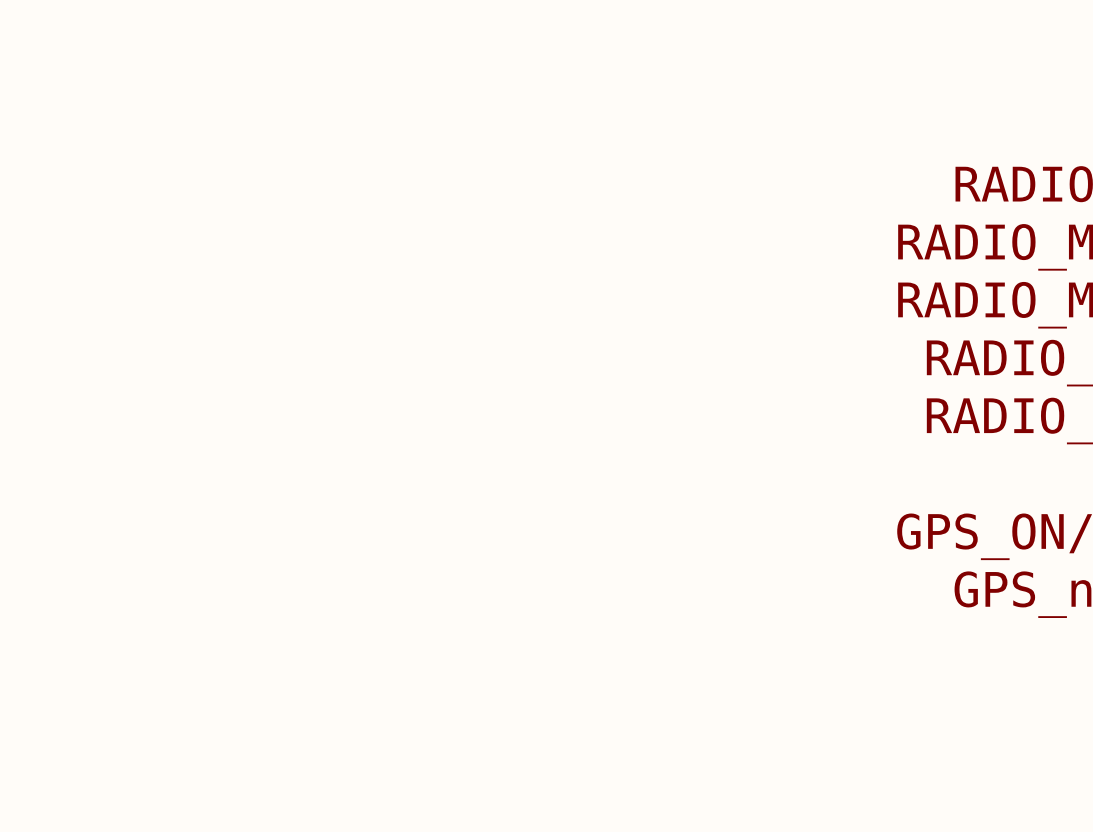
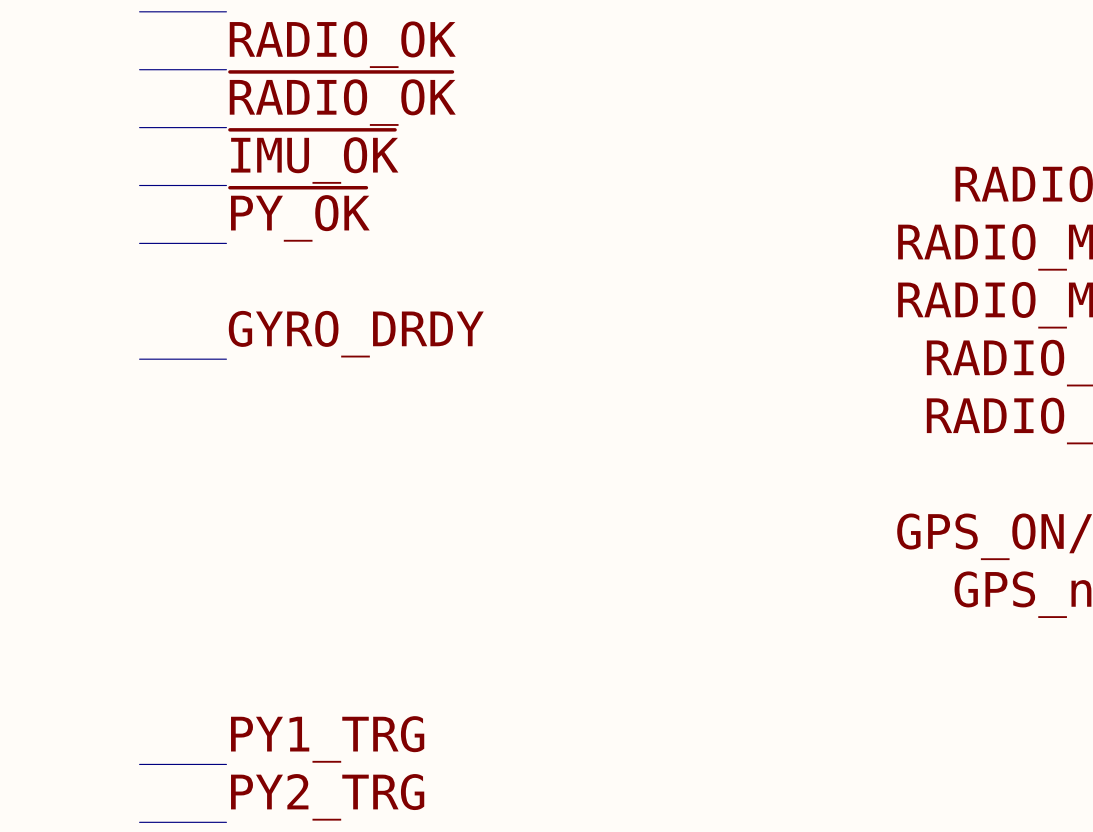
wire: none -> (139, 11) (226, 11)
label: none -> RADIO_OK (342, 44)
wire: none -> (139, 69) (226, 69)
label: none -> ~{RADIO_OK} (342, 98)
wire: none -> (139, 127) (226, 127)
label: none -> ~{IMU_OK} (314, 156)
wire: none -> (139, 185) (226, 185)
label: none -> ~{PY_OK} (299, 214)
wire: none -> (139, 243) (226, 243)
label: none -> GYRO_DRDY (356, 334)
wire: none -> (139, 359) (226, 359)
label: none -> PY1_TRG (327, 739)
wire: none -> (139, 764) (226, 764)
label: none -> PY2_TRG (327, 797)
wire: none -> (139, 822) (226, 822)

